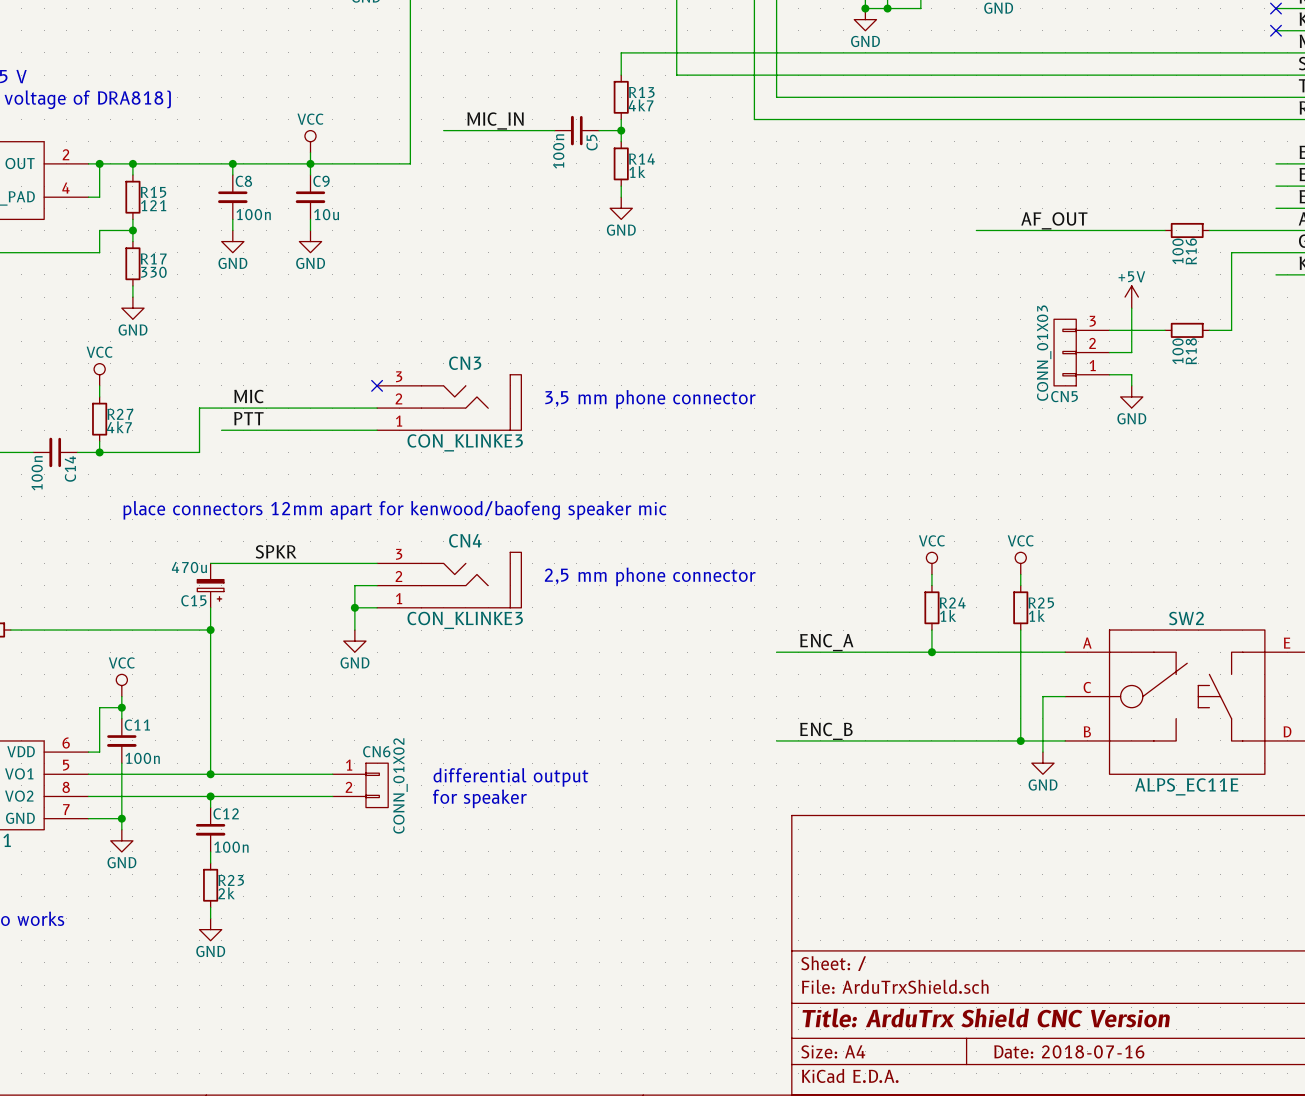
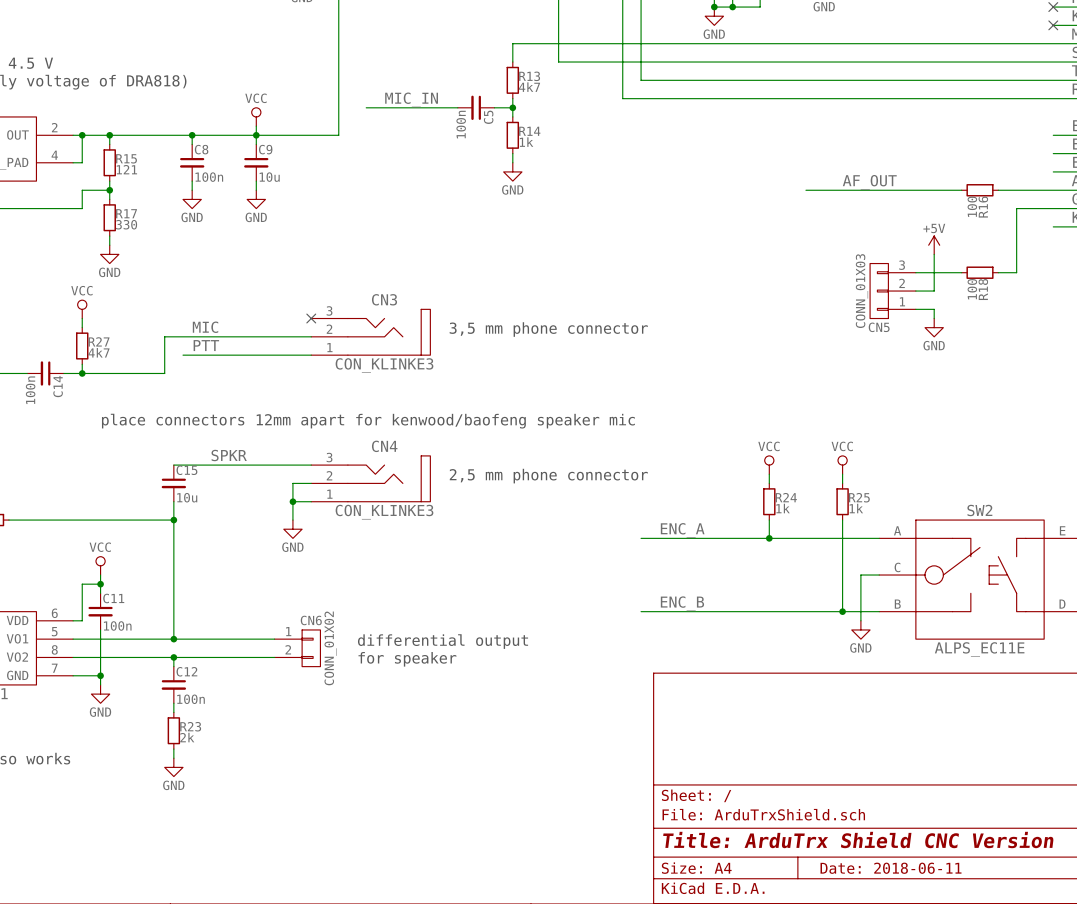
C15 symbol: [197, 563, 224, 608] -> [161, 465, 187, 502]
C15 value: 470u (189, 567) -> 10u (187, 497)
C15 name position: C15 (193, 600) -> C15 (186, 470)
title block: Date: 2018-07-16 (1069, 1051) -> Date: 2018-06-11 (891, 868)

